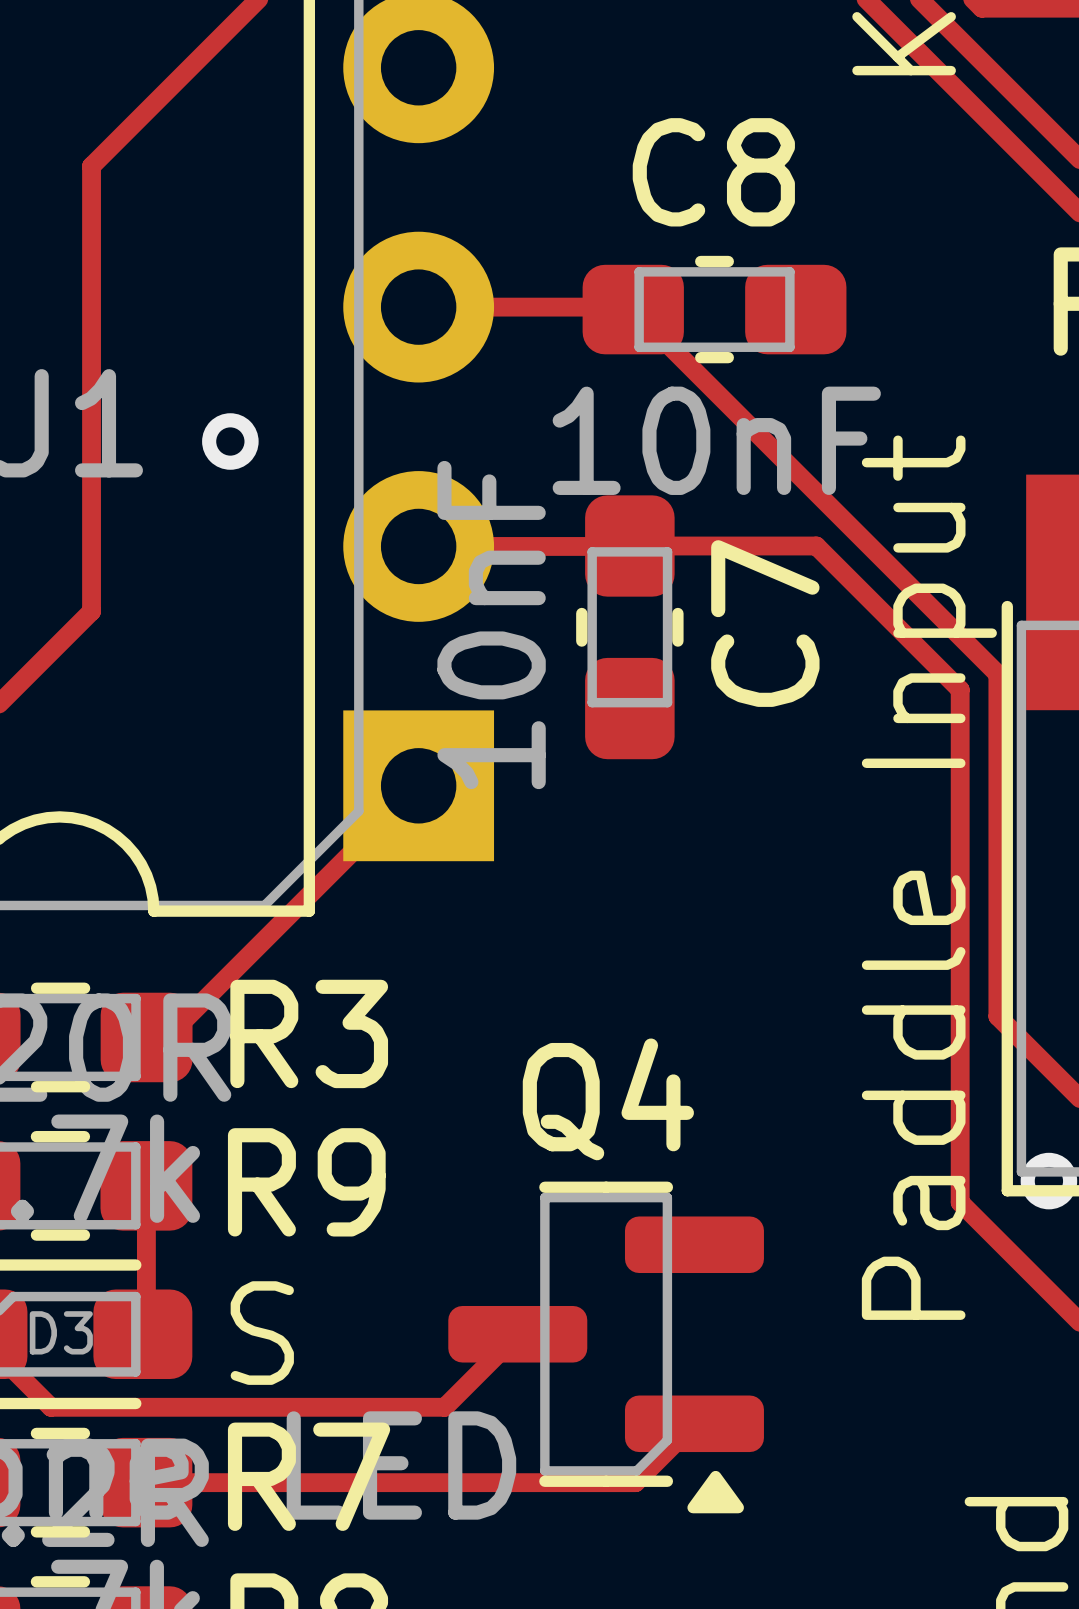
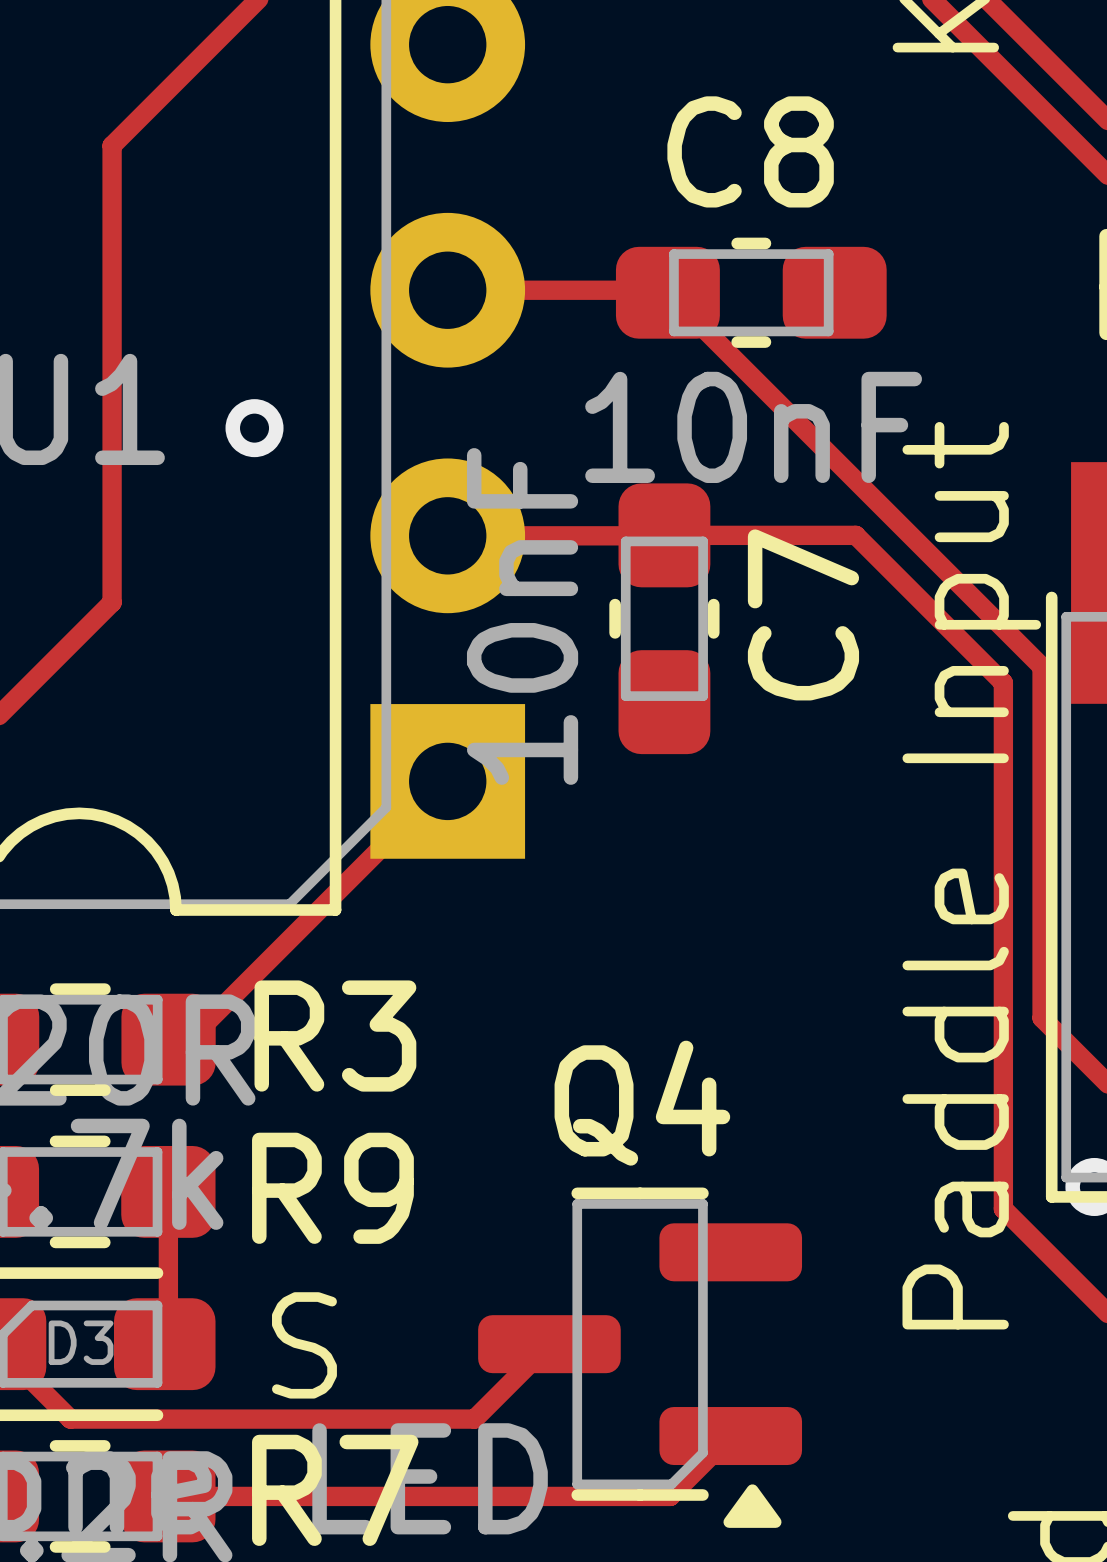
text position: S (262, 1333) -> S (304, 1345)

